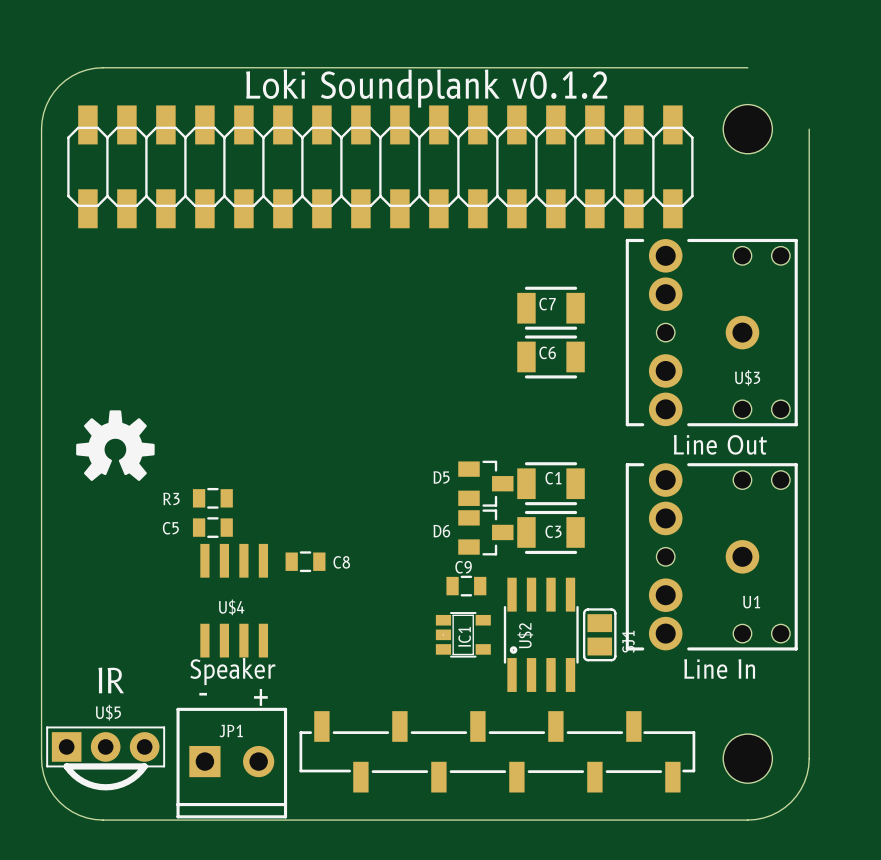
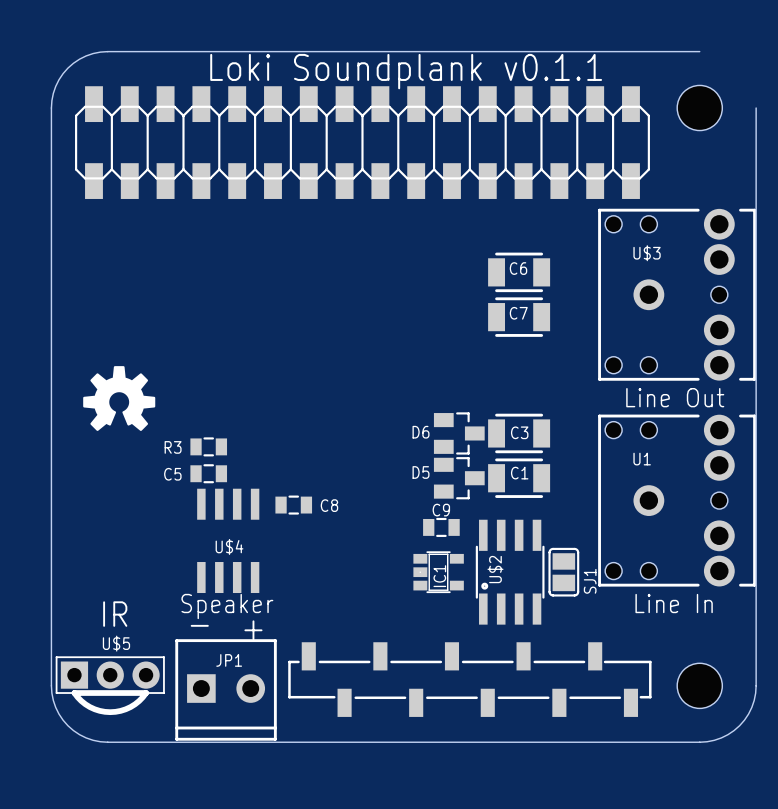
text: Loki Soundplank v0.1.2 (426, 88) -> Loki Soundplank v0.1.1 (406, 71)
C7 name: C7 (547, 304) -> C6 (518, 268)
U$3 rotation: 0° (711, 332) -> 180° (677, 294)
C6 name: C6 (547, 352) -> C7 (518, 313)
D5 name: D5 (441, 477) -> D6 (421, 432)
C1 name: C1 (553, 478) -> C3 (519, 432)
D6 name: D6 (441, 531) -> D5 (421, 472)
C3 name: C3 (553, 531) -> C1 (519, 473)
U1 rotation: 0° (711, 556) -> 180° (677, 500)

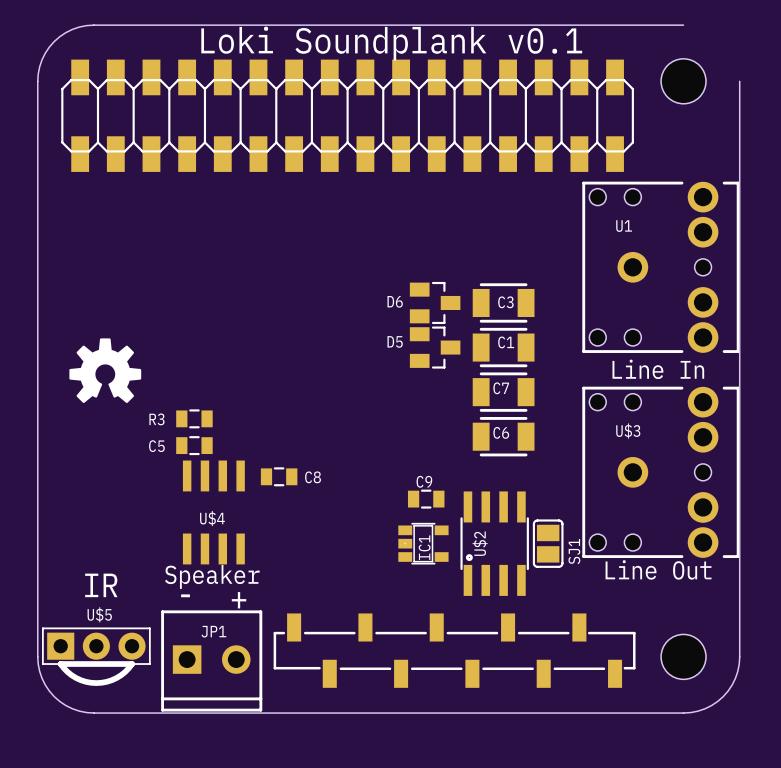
text: Loki Soundplank v0.1.1 (406, 71) -> Loki Soundplank v0.1 (391, 43)
U$3 name: U$3 (647, 253) -> U1 (624, 226)
C6 position: (519, 272) -> (503, 436)
C7 position: (519, 317) -> (503, 392)
text: Line Out (675, 397) -> Line In (658, 369)
D6 position: (459, 433) -> (435, 302)
C3 position: (519, 433) -> (503, 302)
U1 name: U1 (642, 459) -> U$3 (628, 430)
D5 position: (459, 478) -> (435, 347)
C1 position: (519, 478) -> (503, 347)
text: Line In (674, 603) -> Line Out (658, 569)

